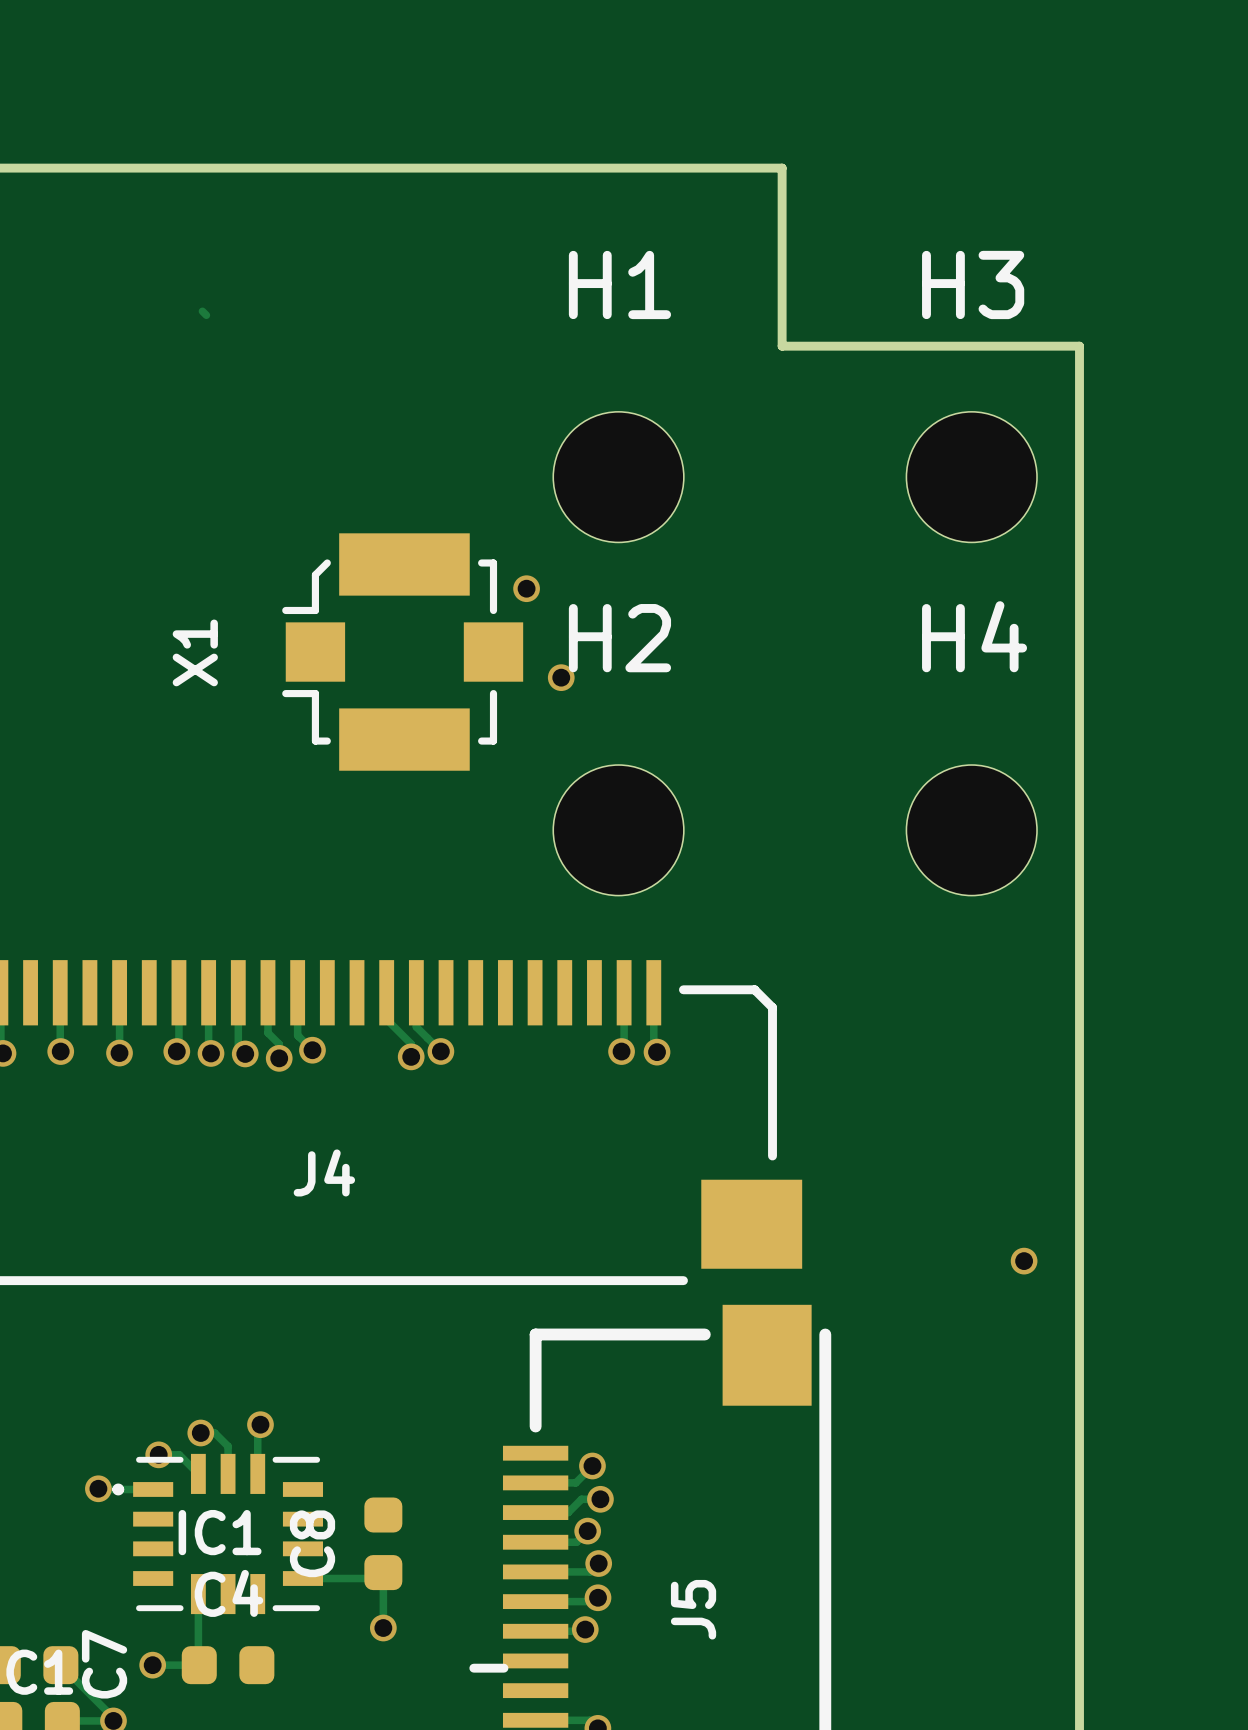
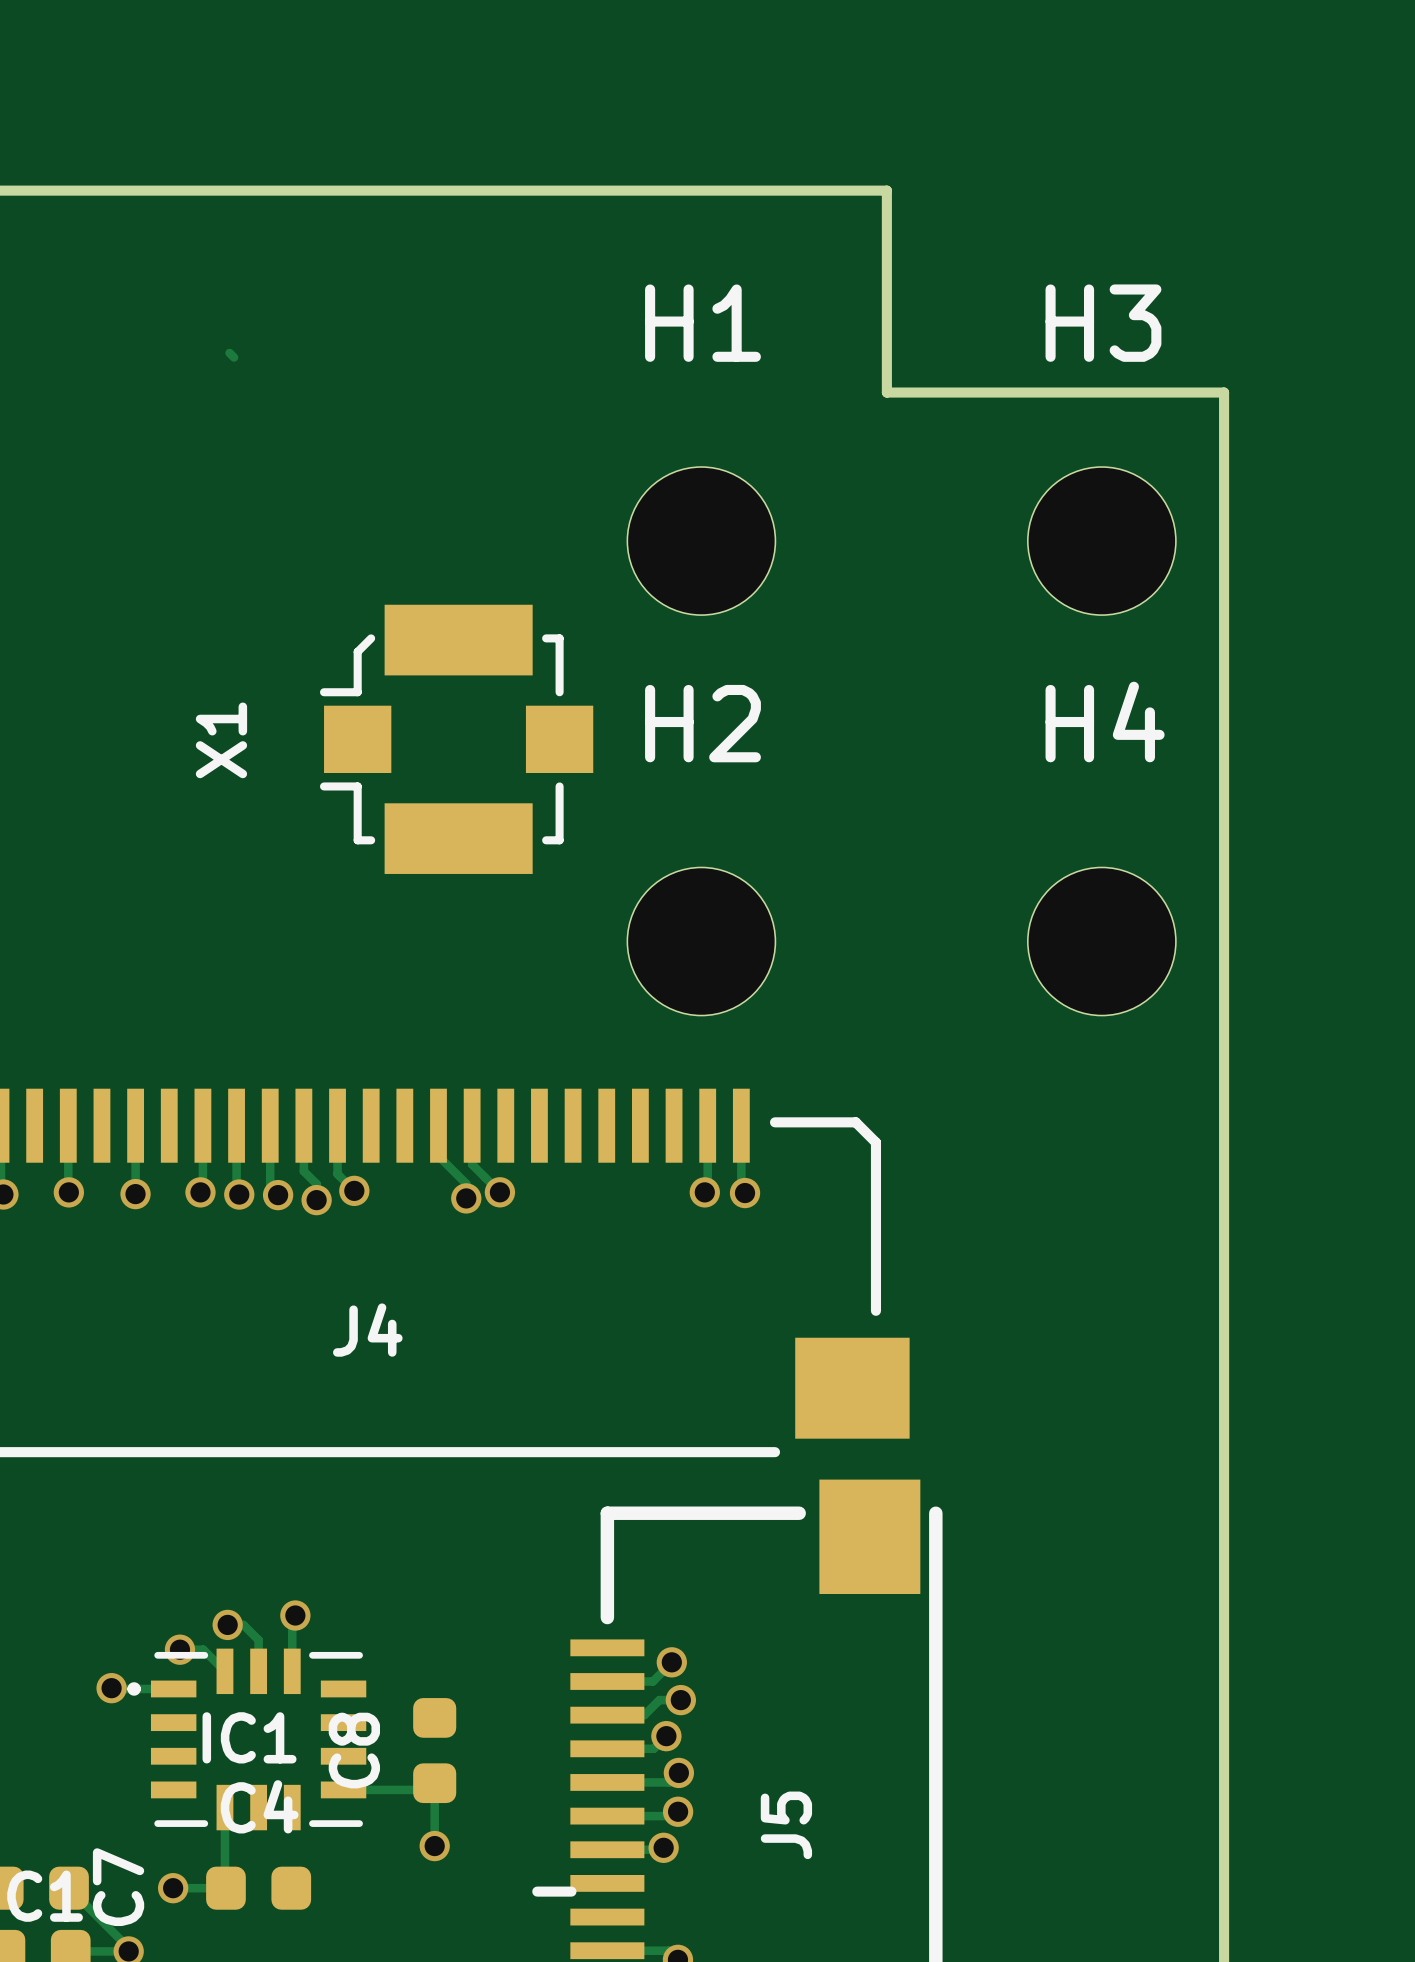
via: (526, 588) -> none
via: (561, 677) -> none
via: (1024, 1261) -> none

